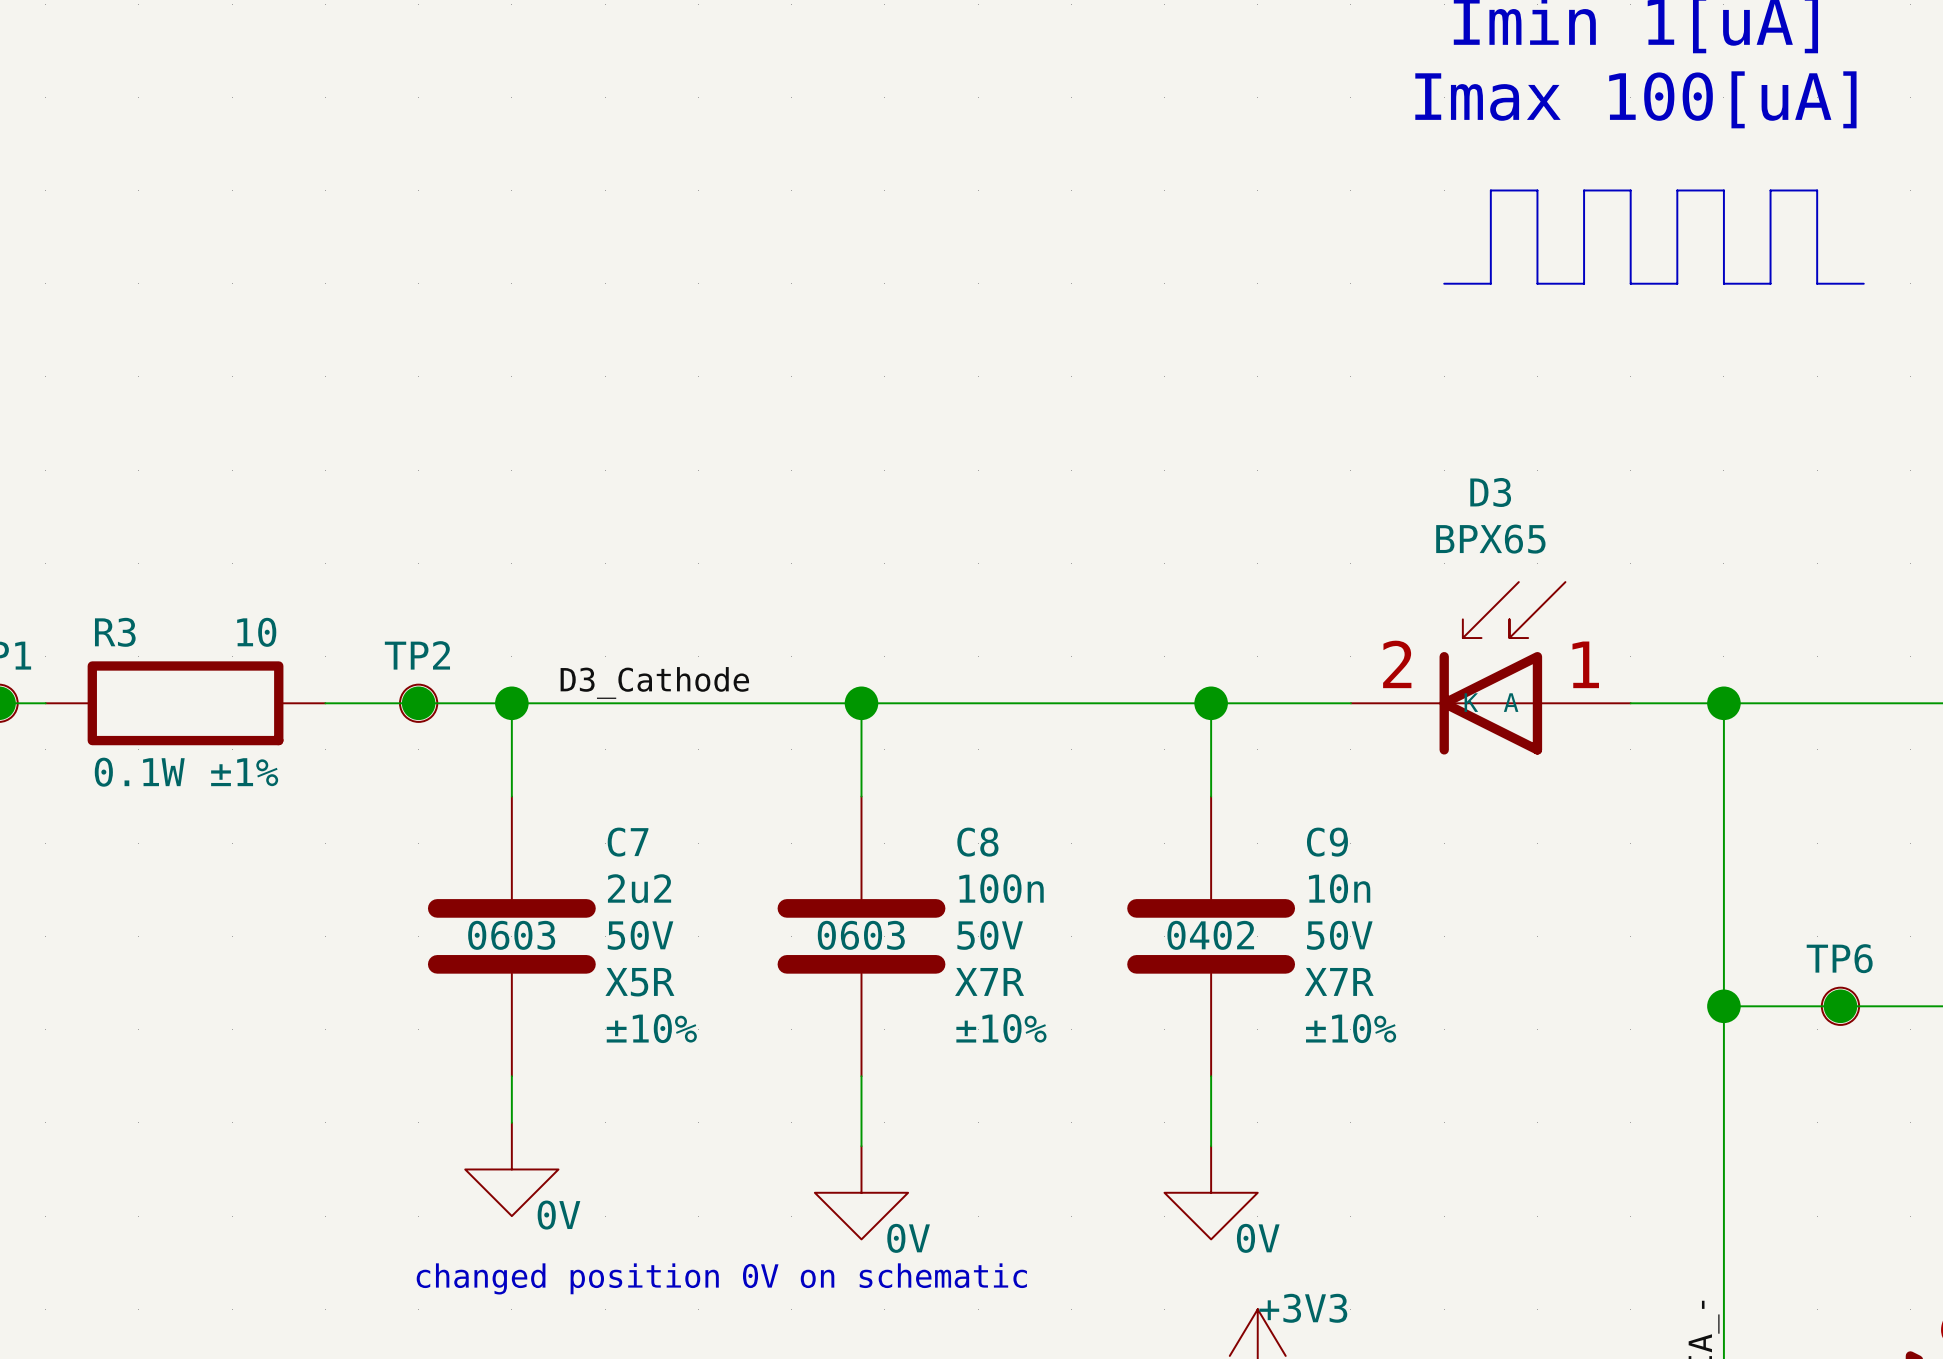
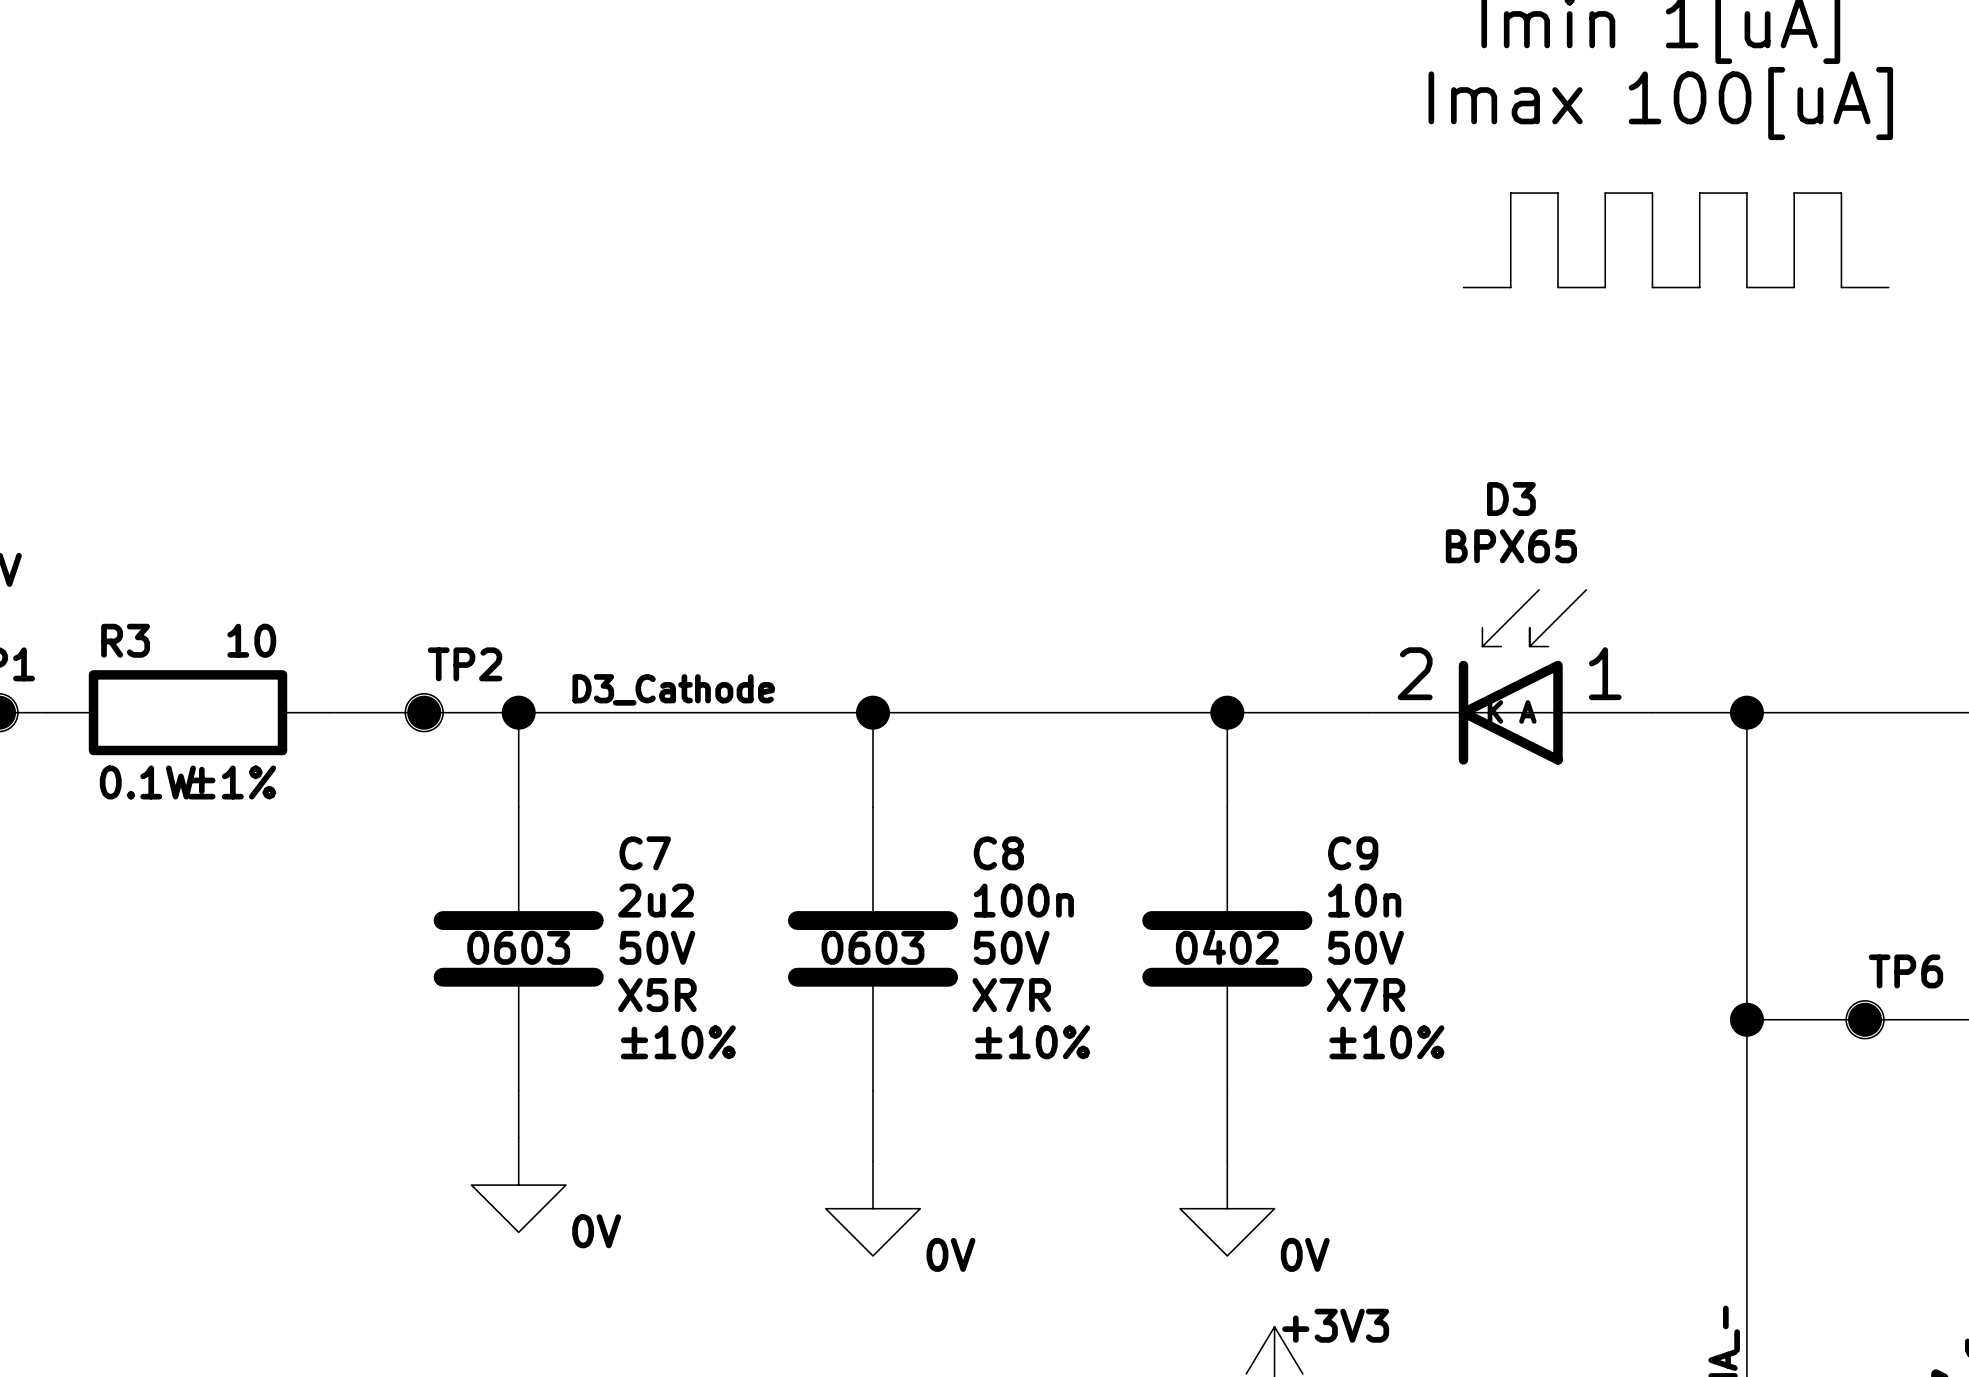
TP2 name position: TP2 (417, 655) -> TP2 (465, 664)
TP6 name position: TP6 (1839, 958) -> TP6 (1905, 971)
power symbol text position: 0V (558, 1215) -> 0V (596, 1231)
power symbol text position: 0V (908, 1238) -> 0V (950, 1254)
power symbol text position: 0V (1258, 1238) -> 0V (1305, 1254)
text: changed position 0V on schematic (721, 1278) -> none

